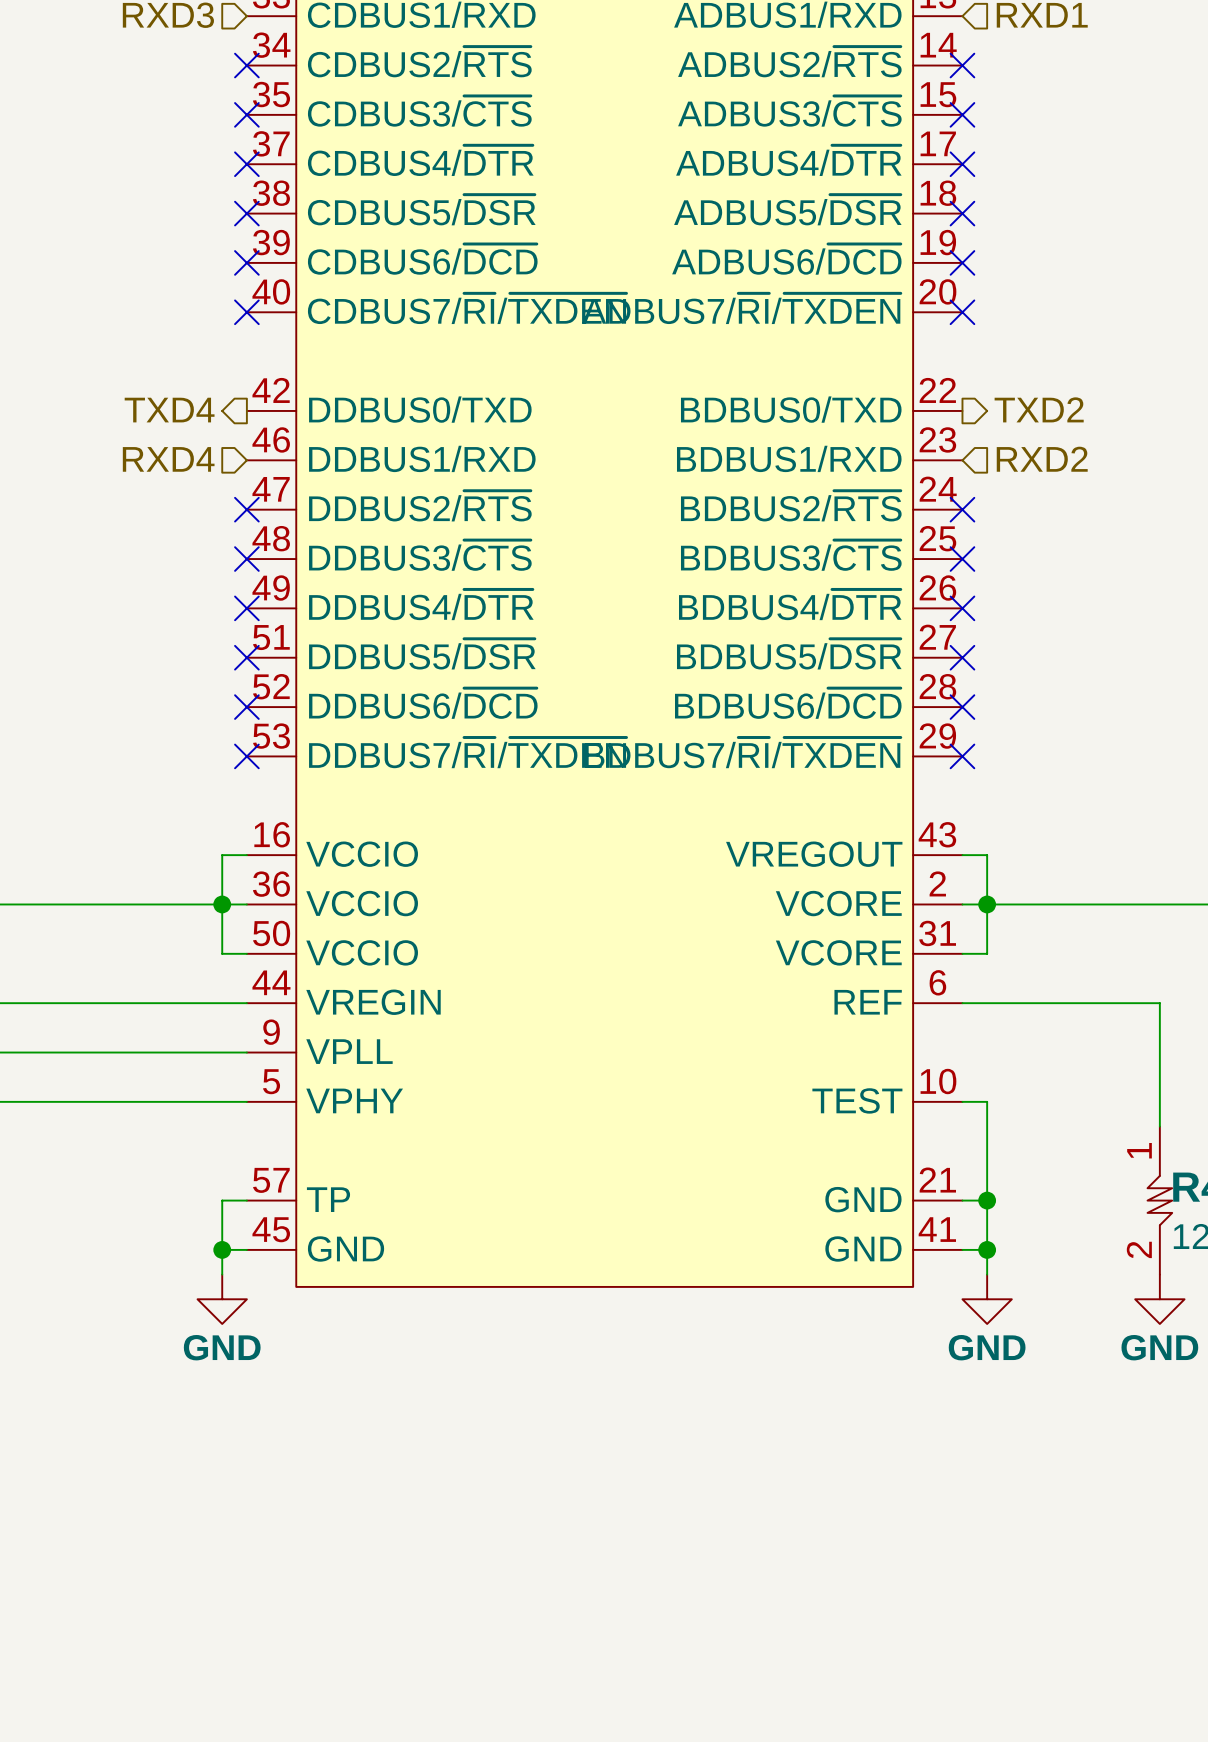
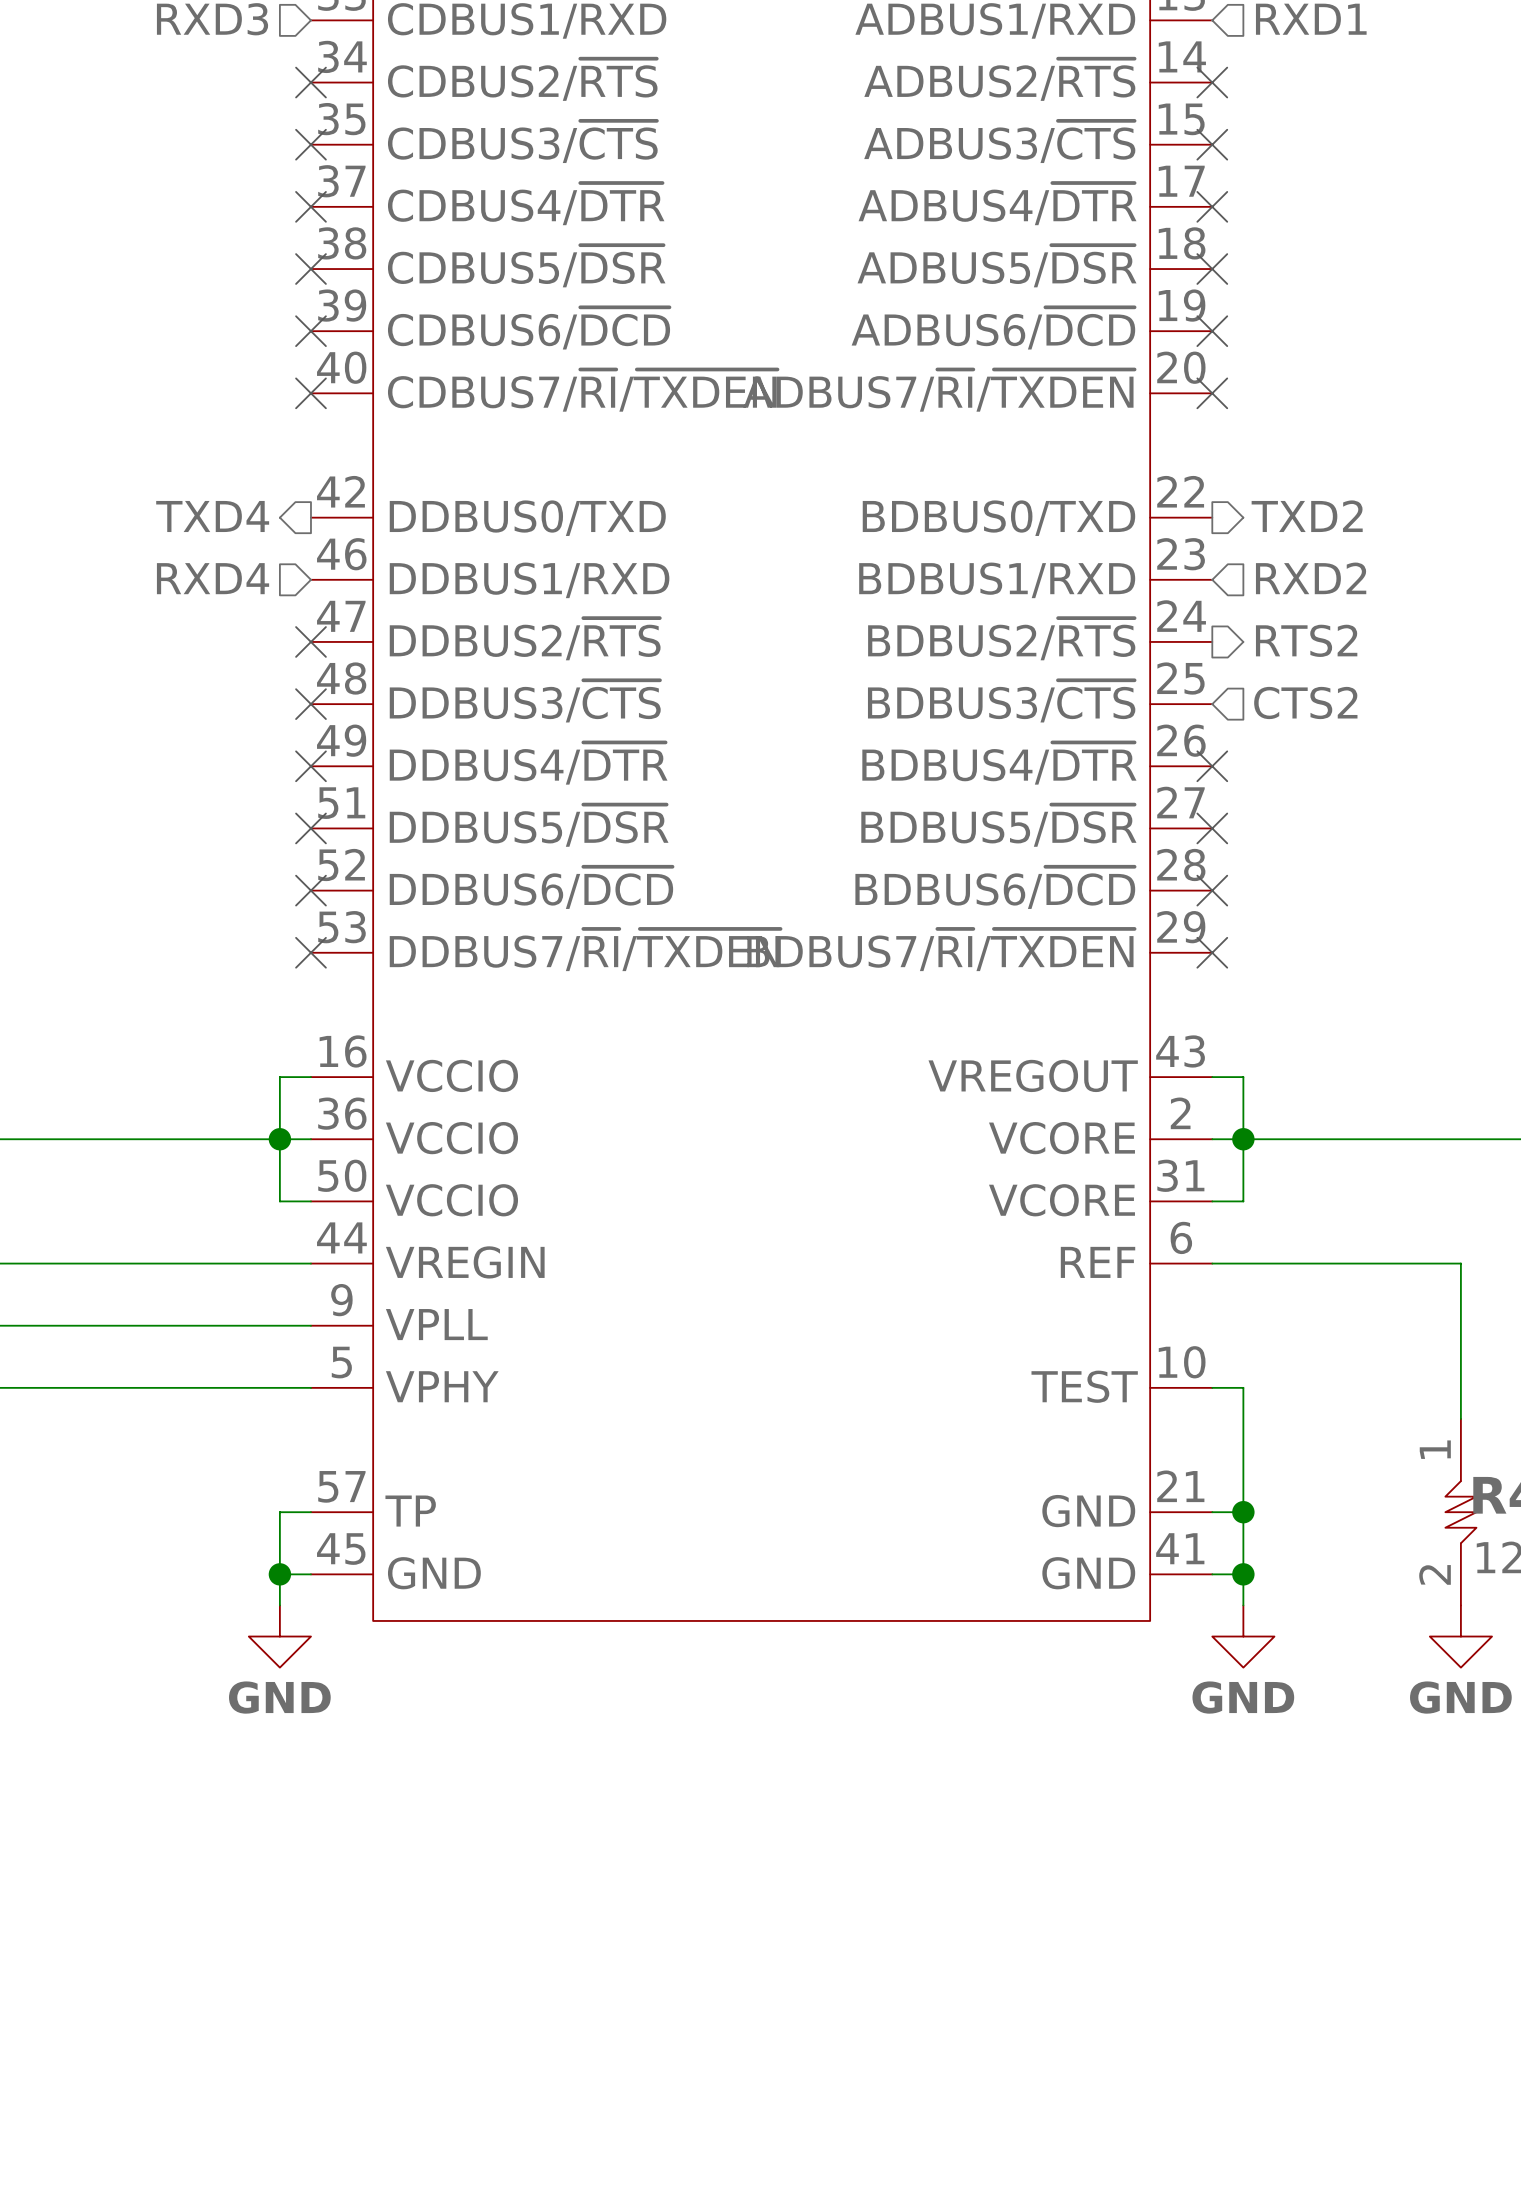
hierarchical label: none -> RTS2 (1306, 640)
no-connect mark: (962, 509) -> none
hierarchical label: none -> CTS2 (1305, 702)
no-connect mark: (962, 559) -> none

